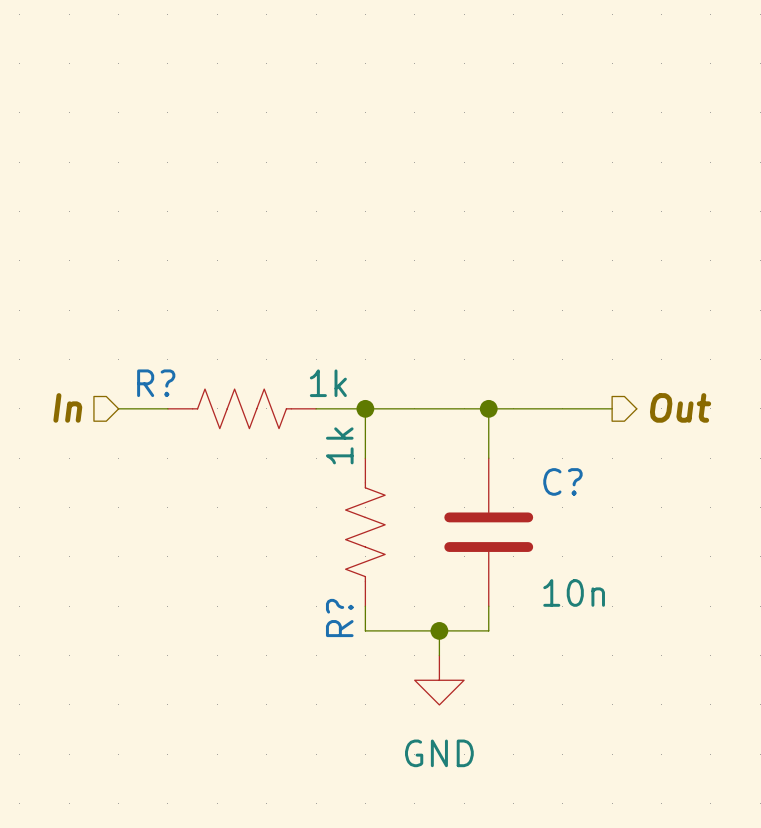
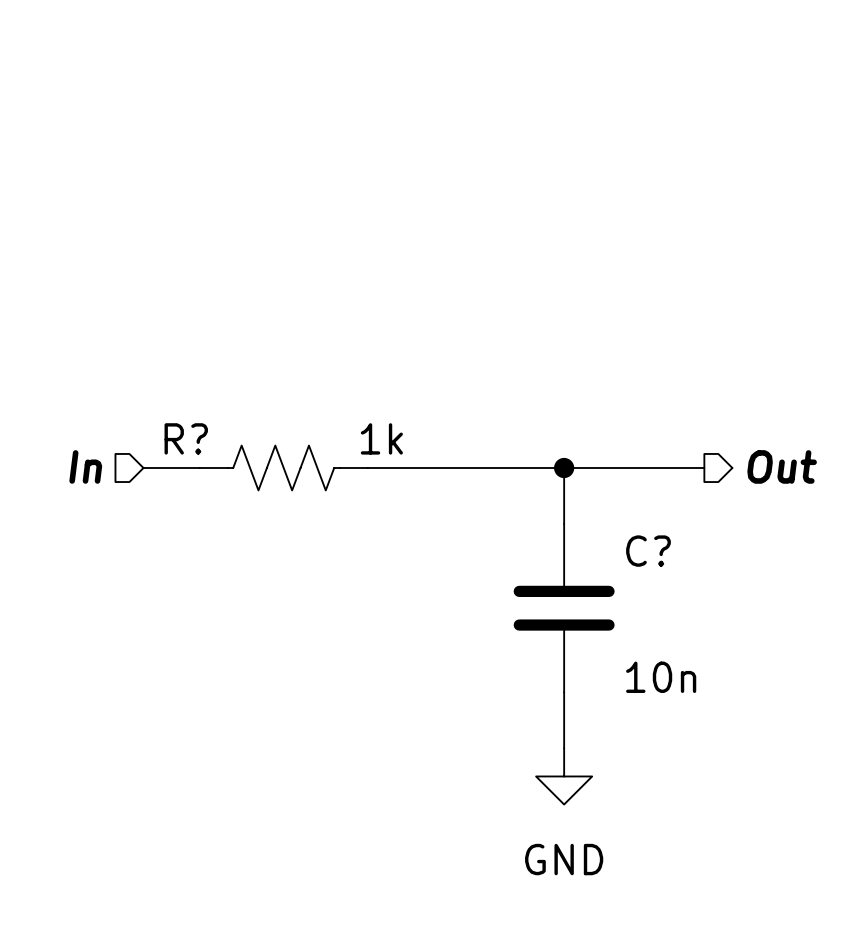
wire: (365, 408) (365, 458) -> none
junction: (365, 408) -> none
R?: 1k (365, 532) -> none
wire: (365, 606) (365, 630) (488, 630) -> (564, 748) (564, 720)
wire: (439, 630) (439, 655) -> none
junction: (439, 630) -> none
power symbol position: GND (439, 680) -> GND (564, 776)

